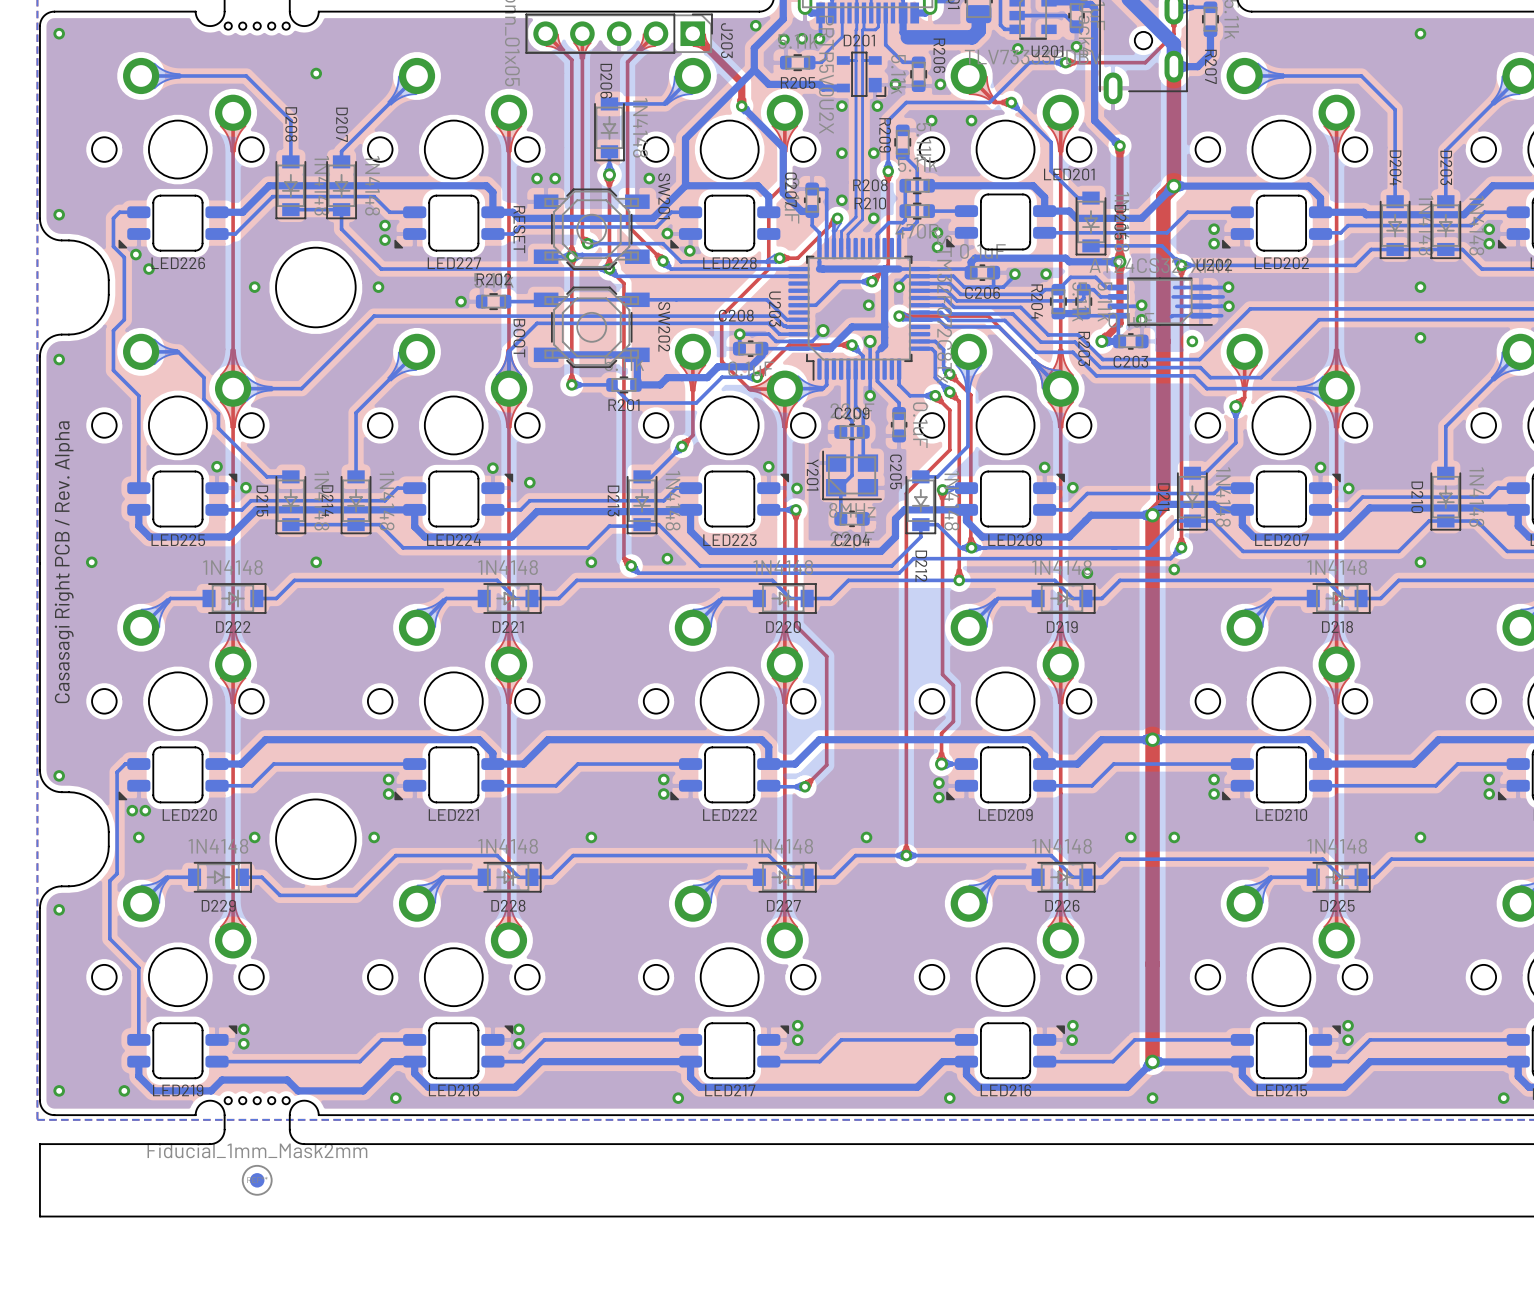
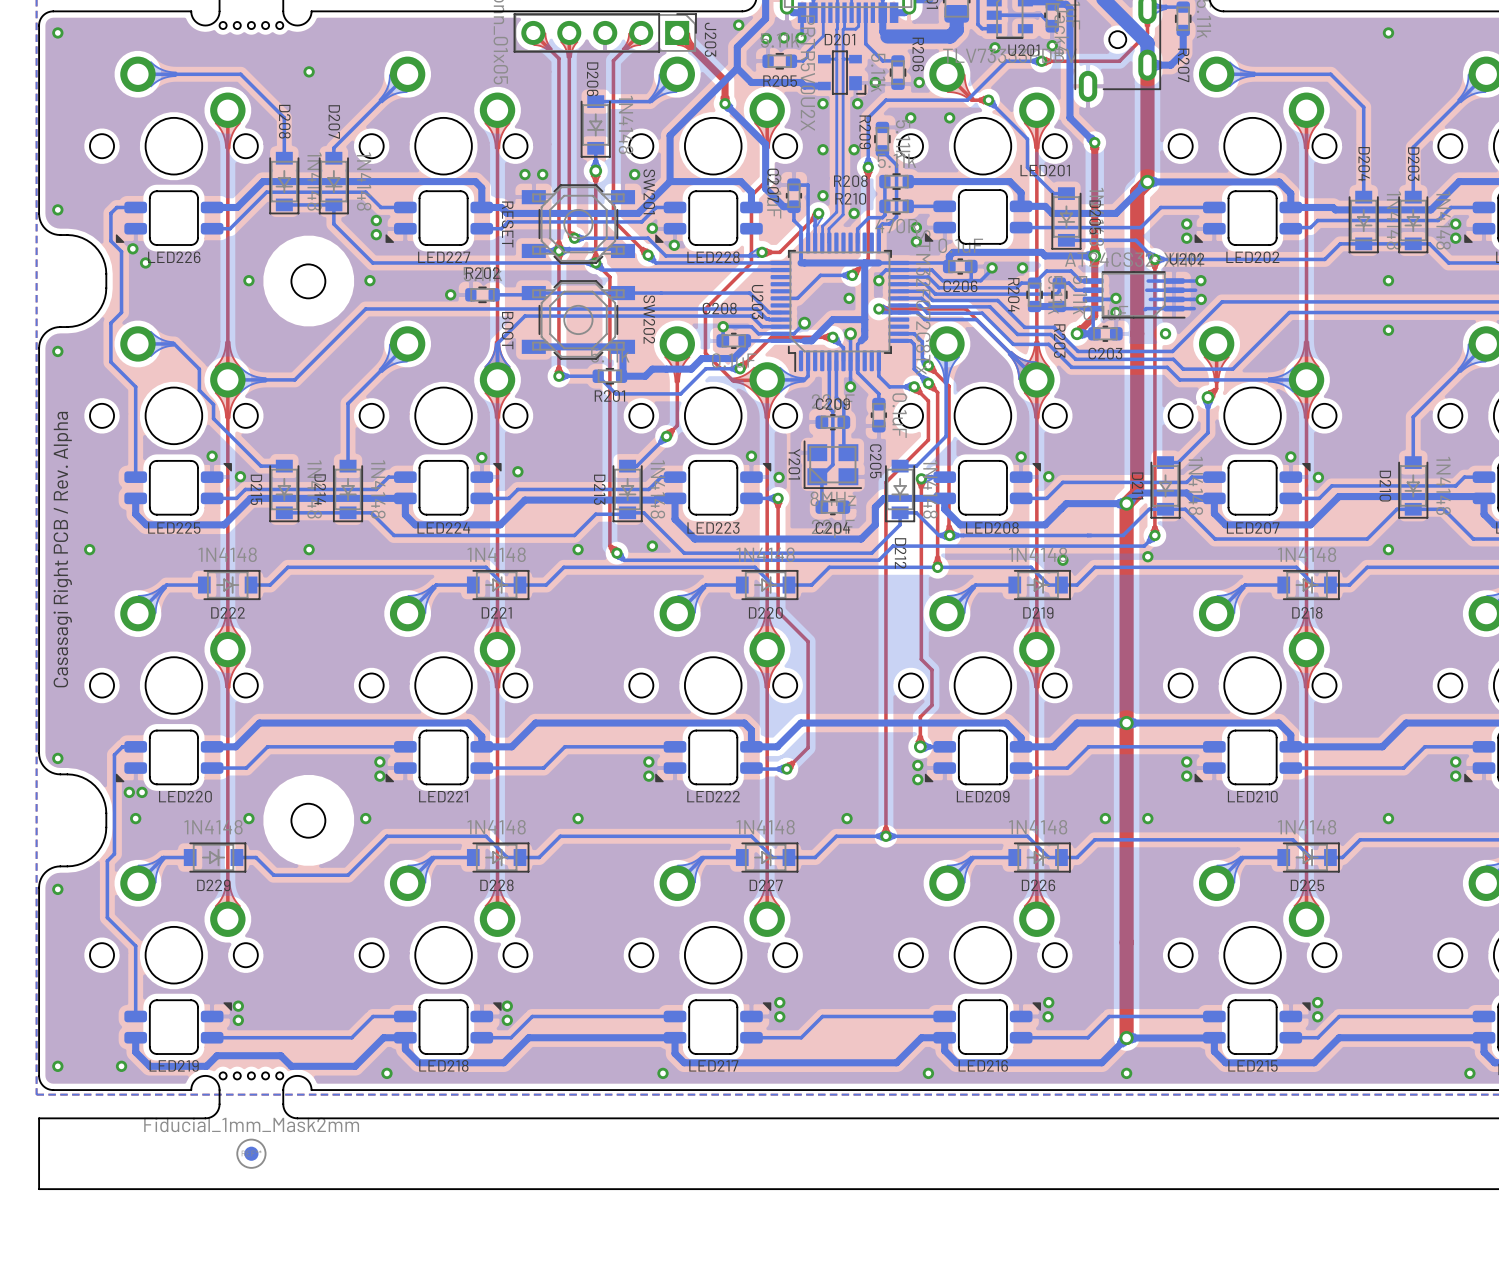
round board edge size: [275, 246, 357, 329] -> [290, 263, 327, 300]
round board edge size: [275, 798, 357, 880] -> [290, 803, 327, 839]

